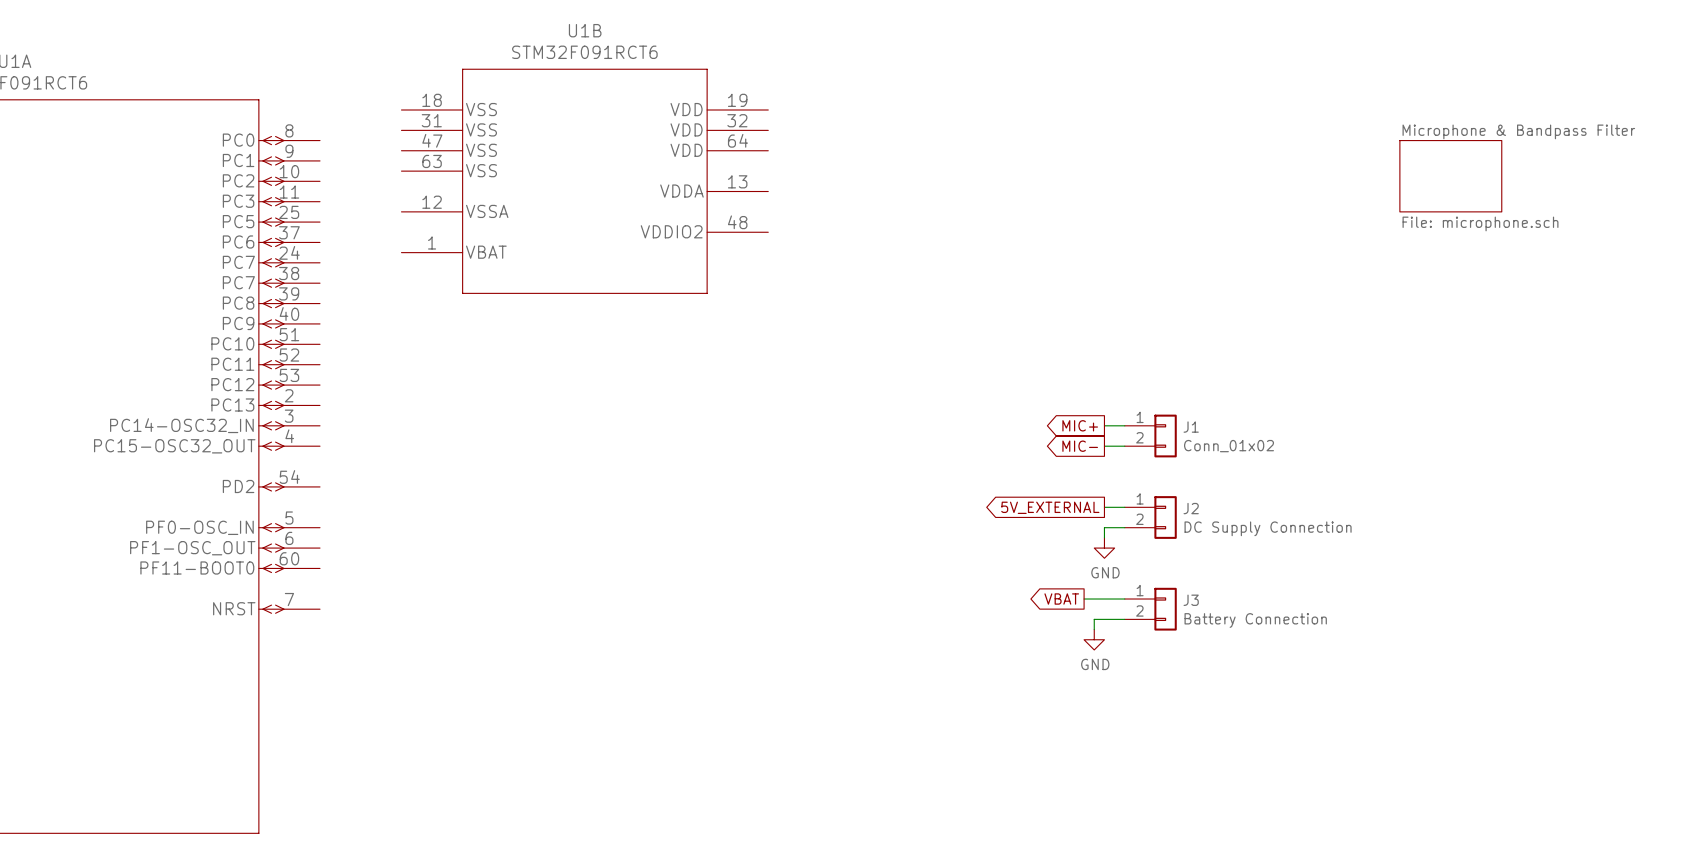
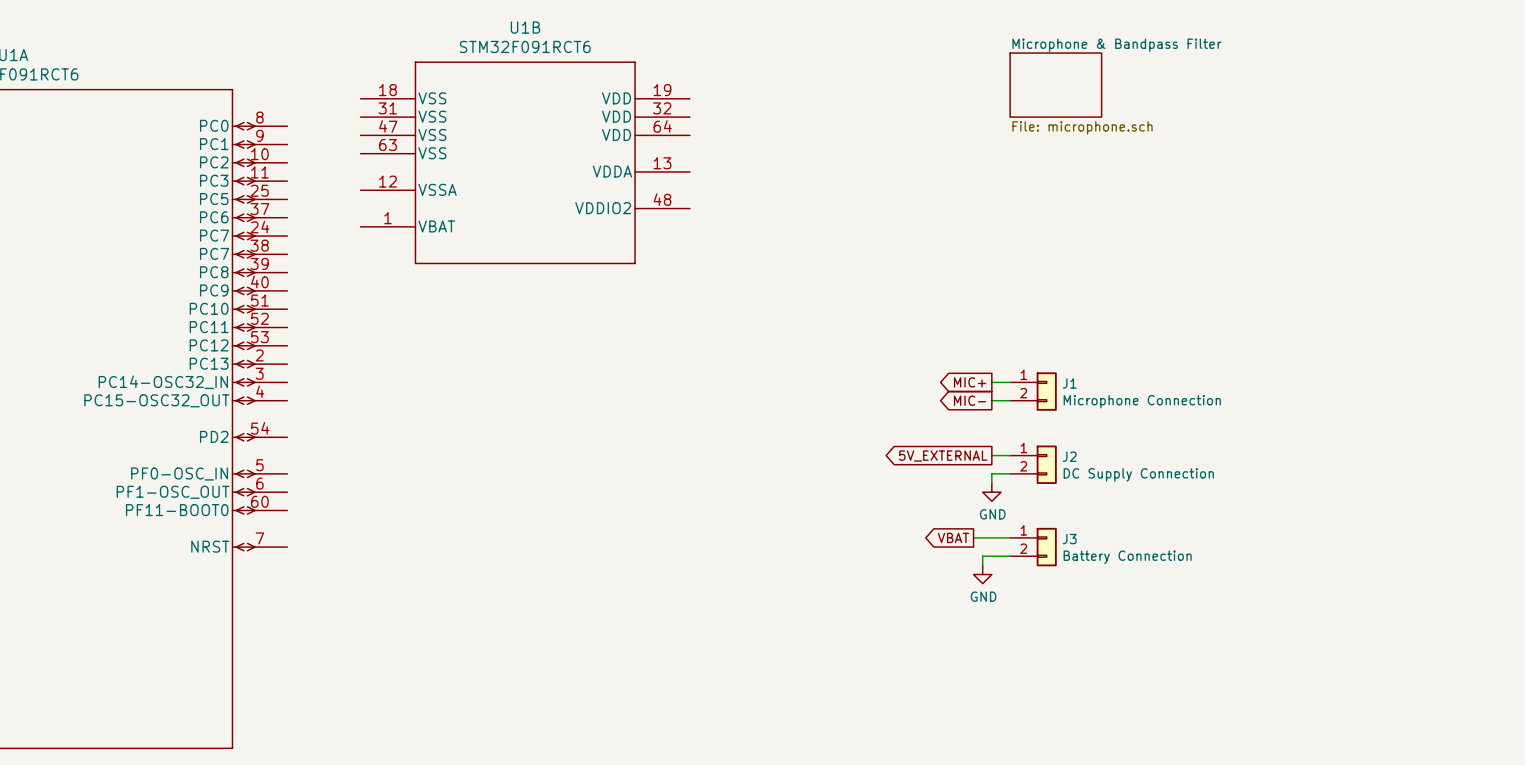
sheet Microphone & Bandpass Filter: none -> File: microphone.sch (1055, 85)
sheet Microphone & Bandpass Filter: File: microphone.sch (1450, 176) -> none
J1 value: Conn_01x02 (1229, 446) -> Microphone Connection (1142, 401)

